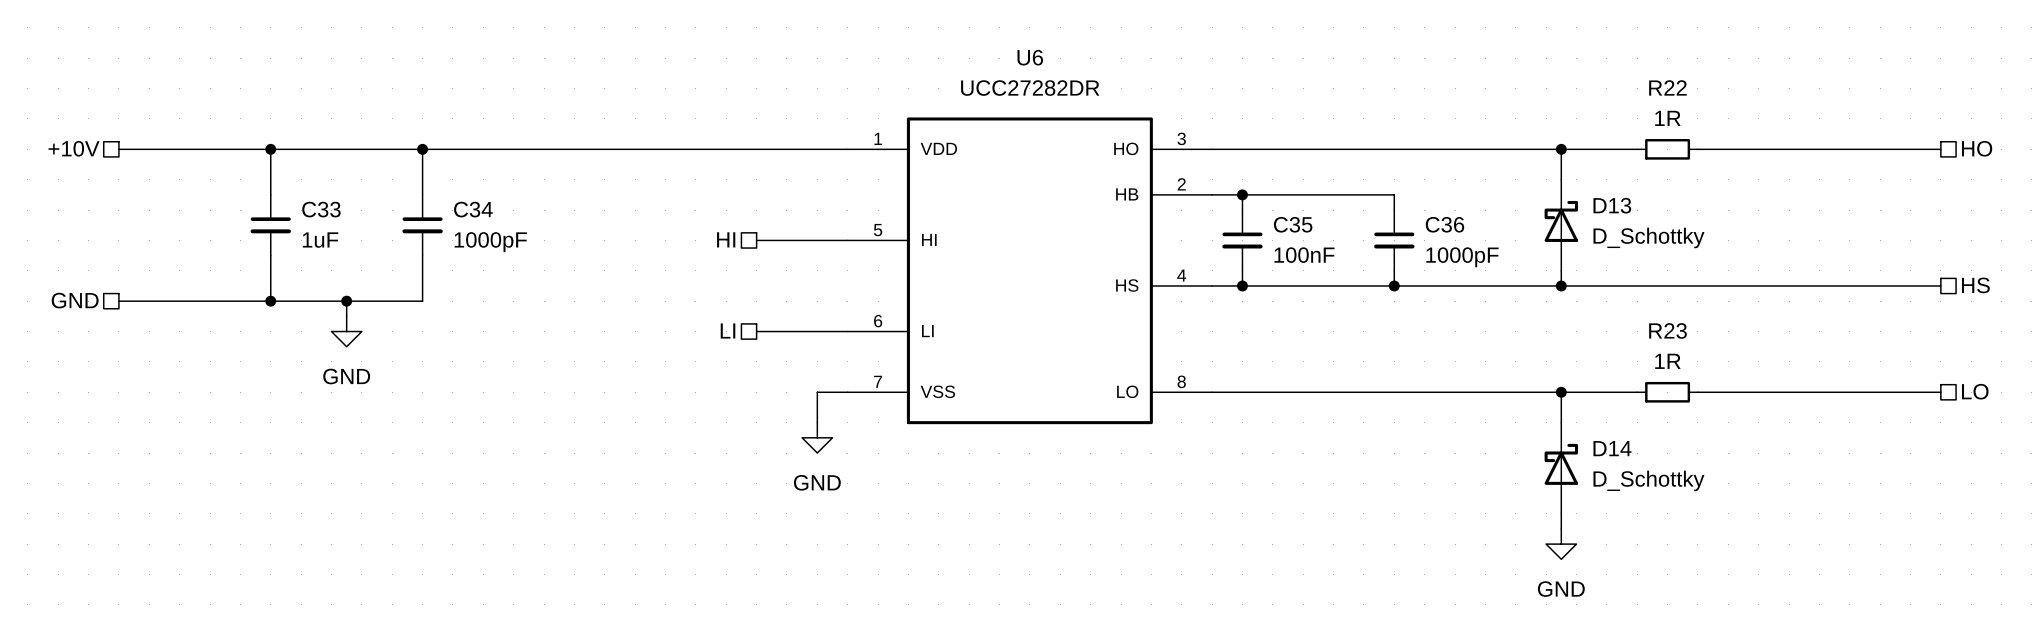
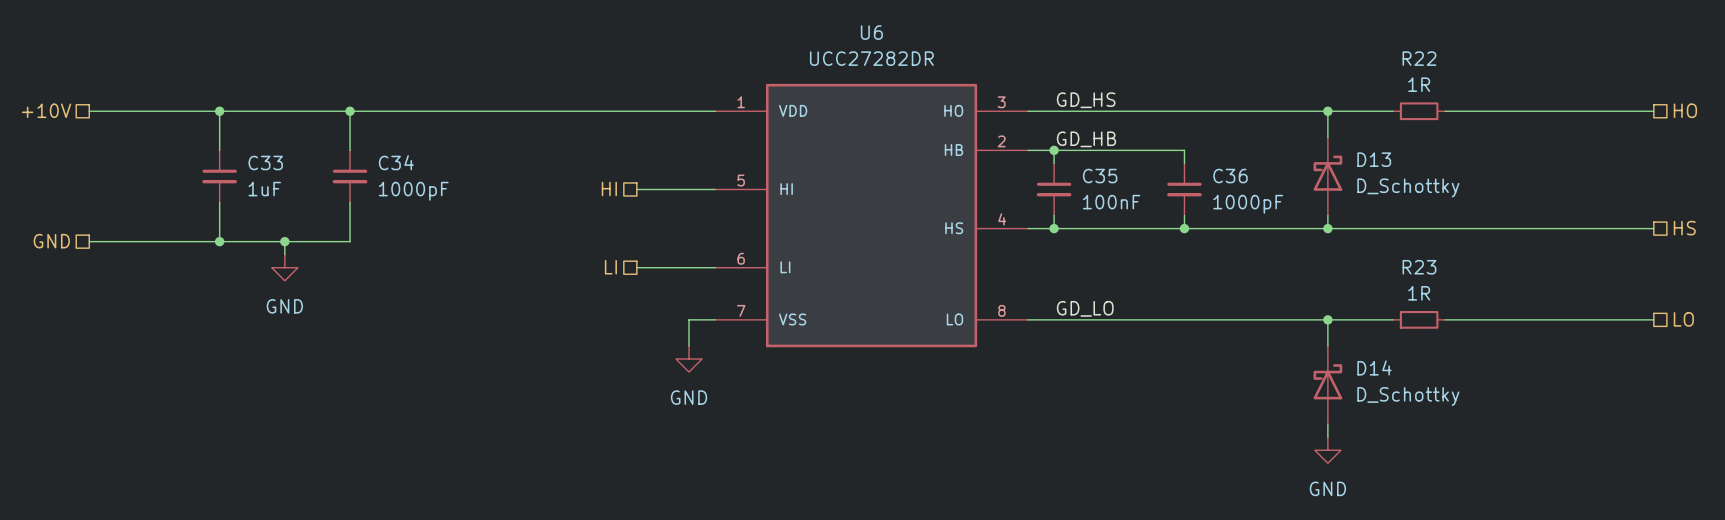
label: none -> GD_HS (1086, 100)
label: none -> GD_HB (1086, 139)
label: none -> GD_LO (1085, 308)

